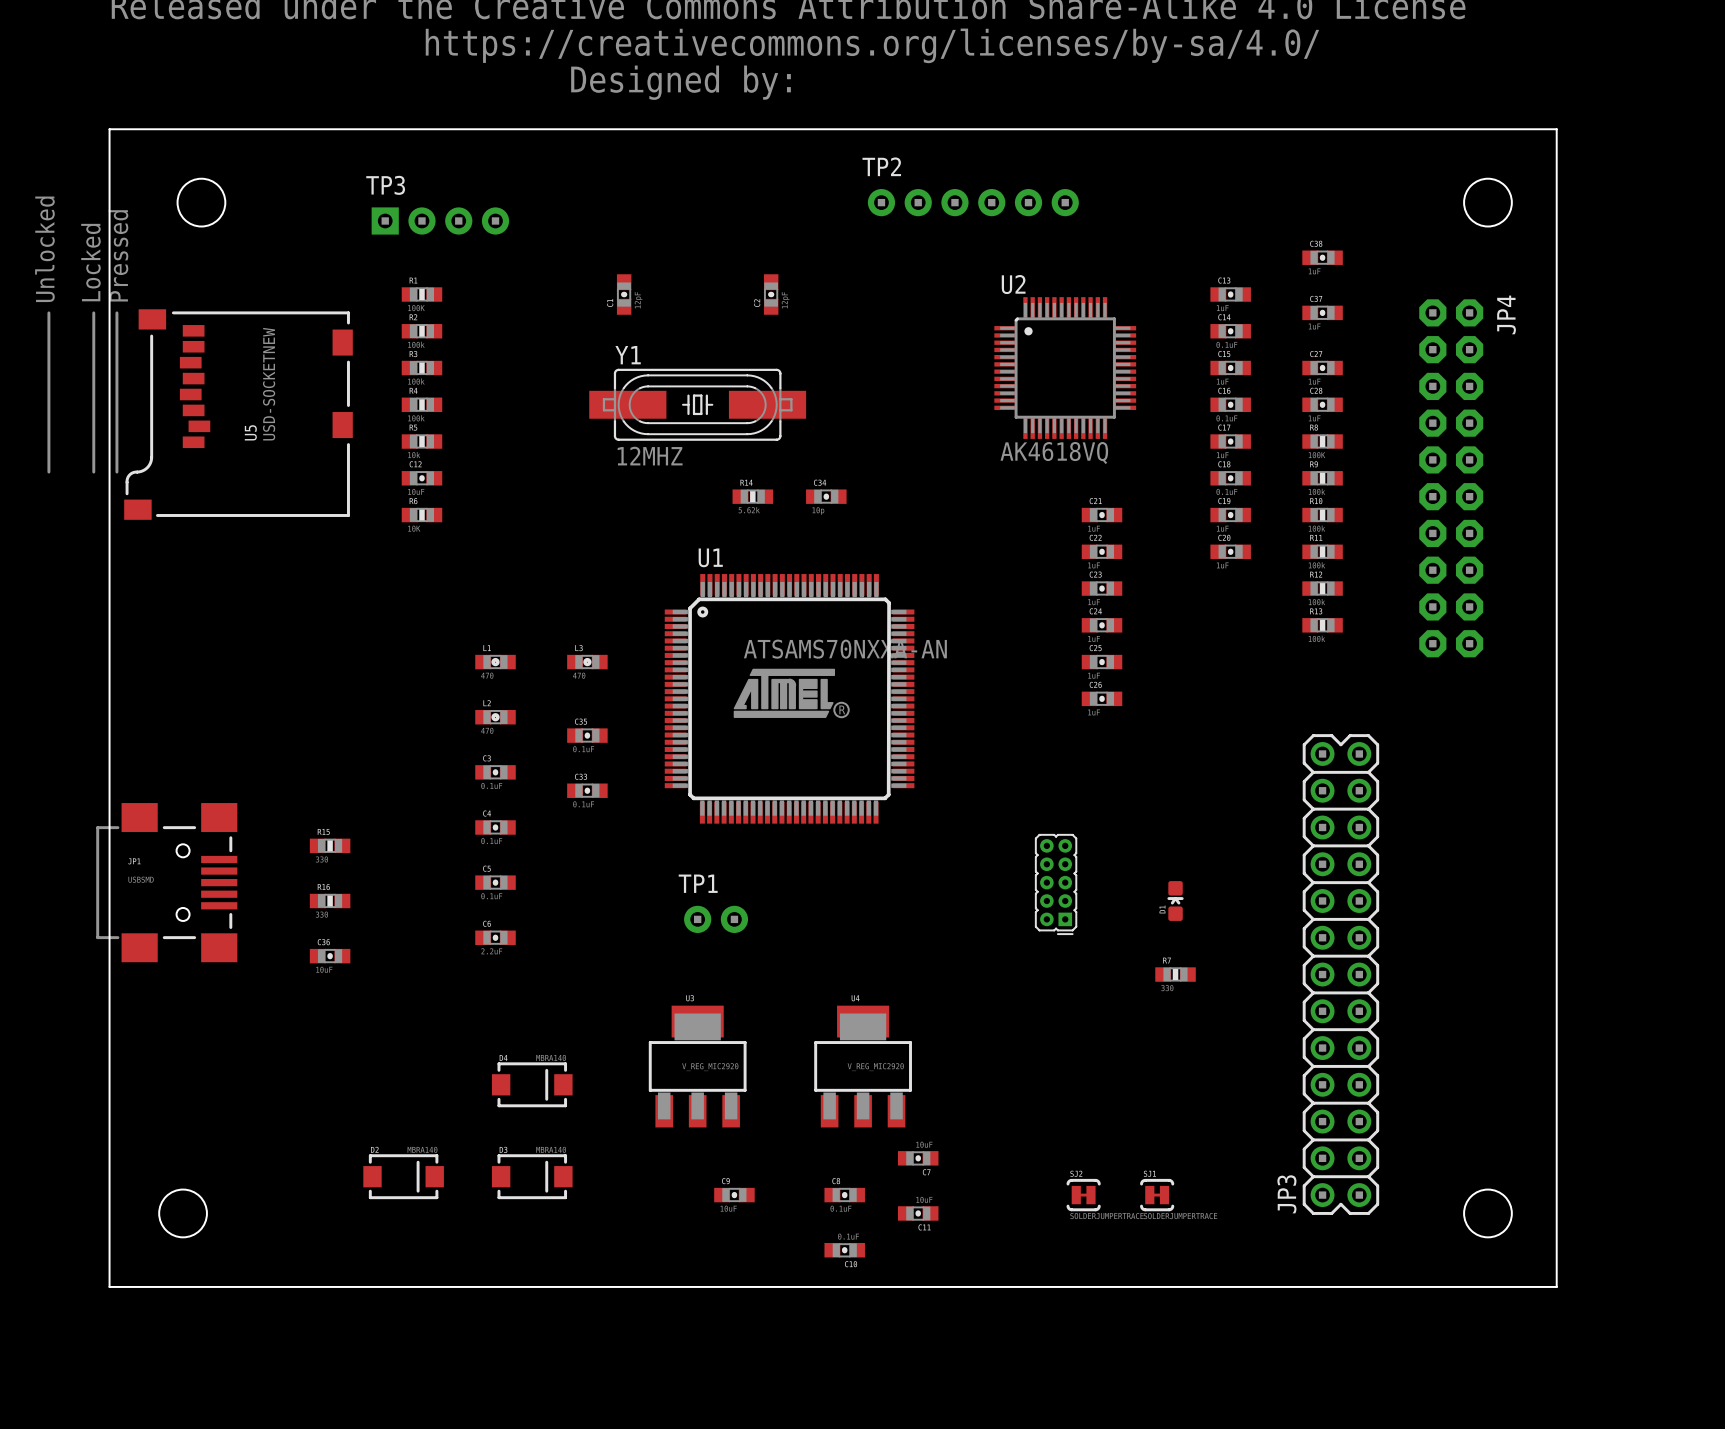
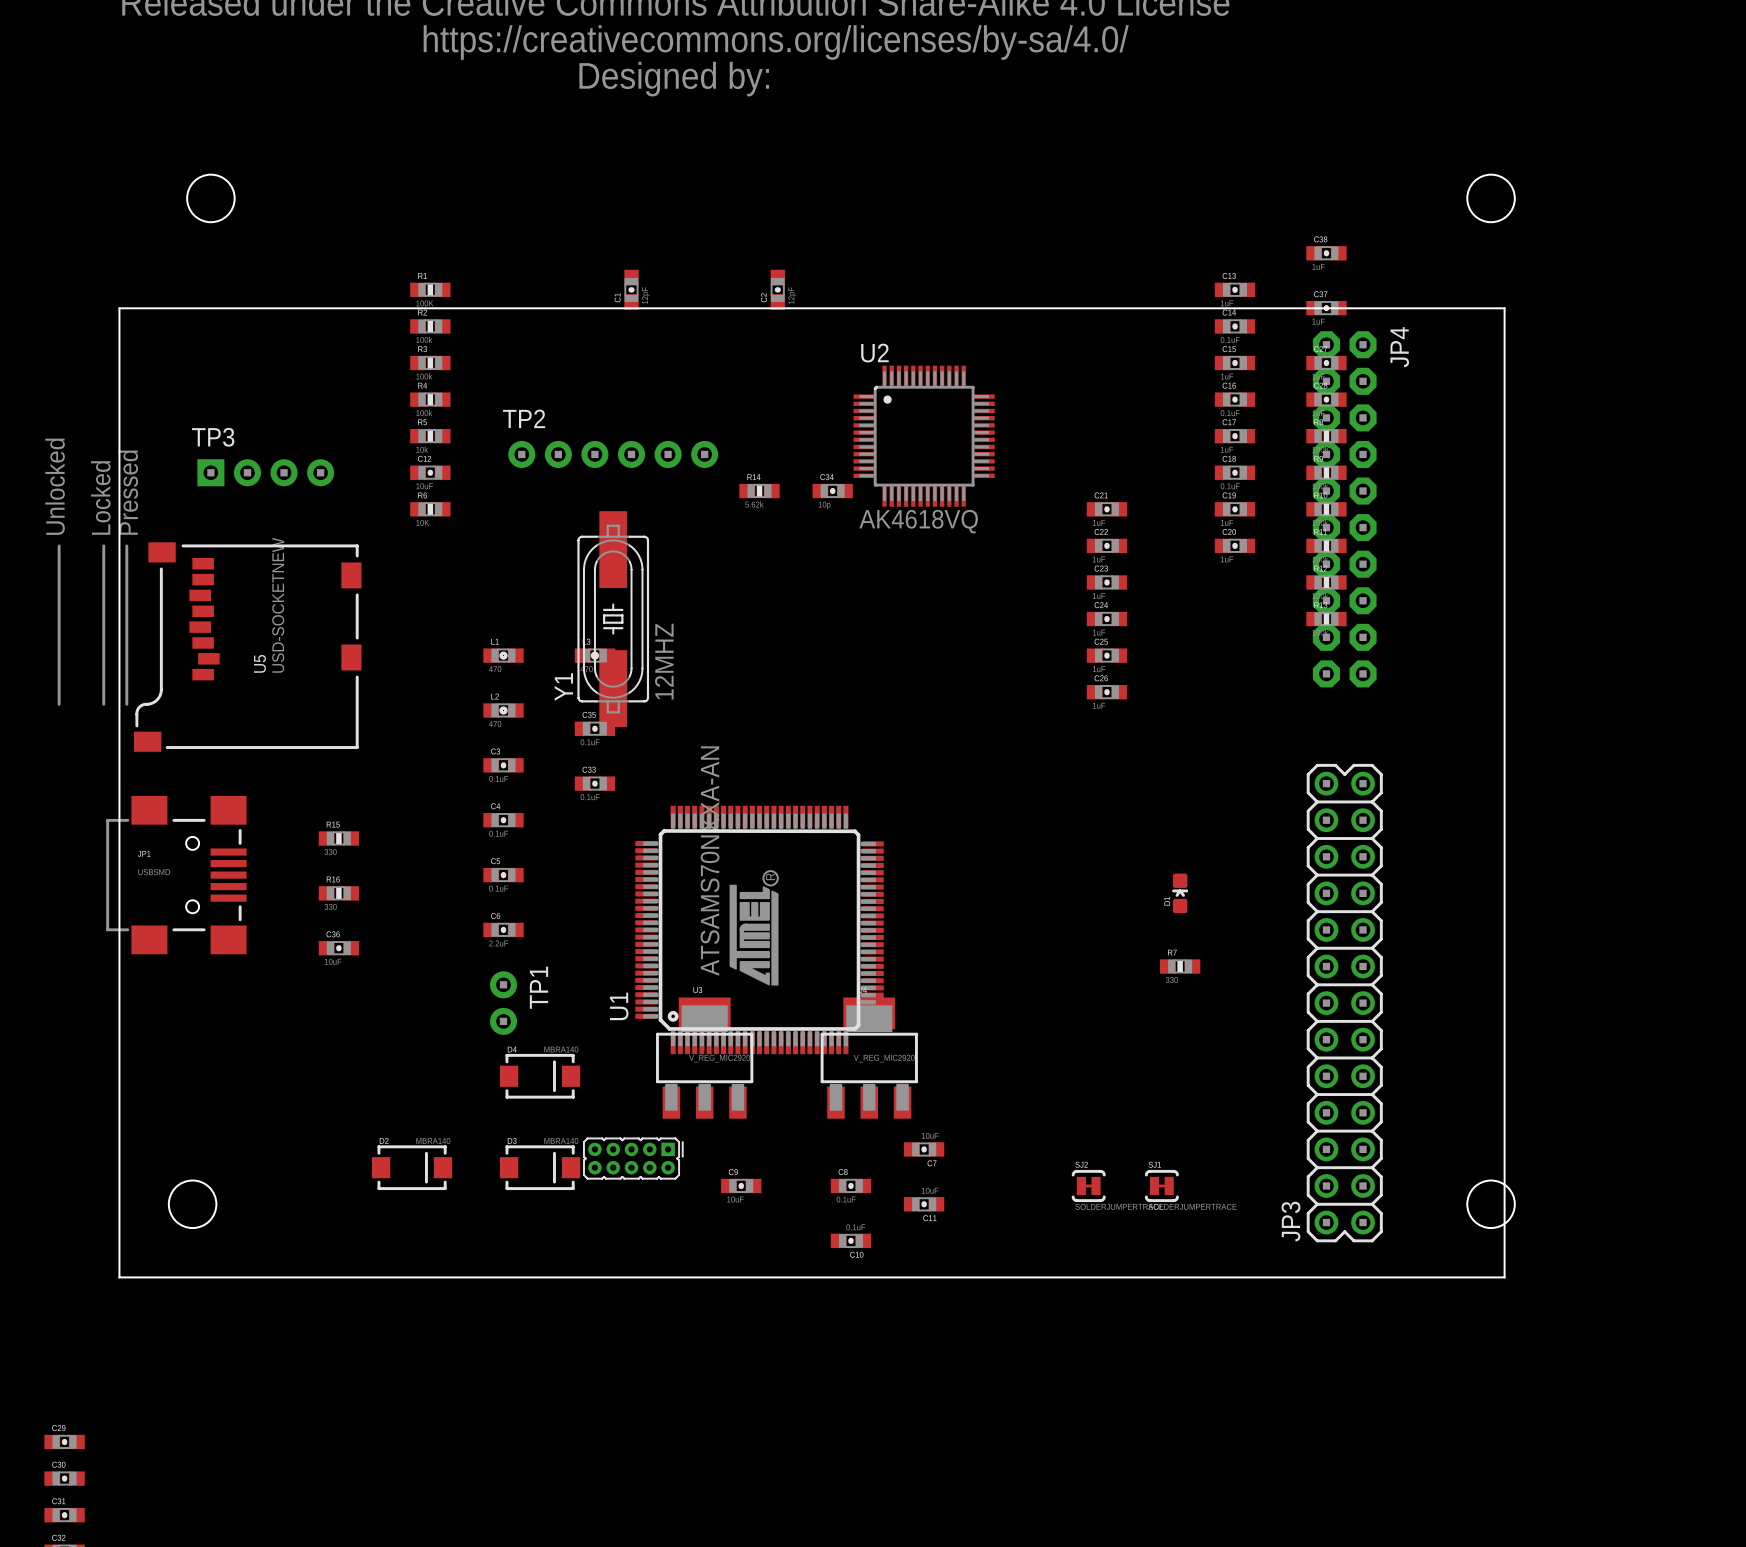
TP2 position: (973, 202) -> (613, 454)
TP3 position: (440, 220) -> (265, 472)
board edge: (109, 313) (109, 129) (1556, 129) (1556, 1286) (1501, 1286) -> (119, 308) (1504, 308) (1504, 1277)
U2 position: (1065, 368) -> (924, 436)
Y1 rotation: 0° (697, 404) -> 90° counterclockwise (613, 619)
Y1 position: (697, 404) -> (613, 619)
U5 position: (200, 414) -> (209, 647)
JP4 position: (1451, 478) -> (1344, 509)
U1 rotation: 0° (789, 698) -> 90° counterclockwise (759, 929)
U1 position: (789, 698) -> (759, 929)
part: (1056, 884) -> none
TP1 rotation: 0° (716, 919) -> 90° clockwise (503, 1003)
TP1 position: (716, 919) -> (503, 1003)
JP3 position: (1340, 974) -> (1344, 1003)
part: none -> (633, 1158)

